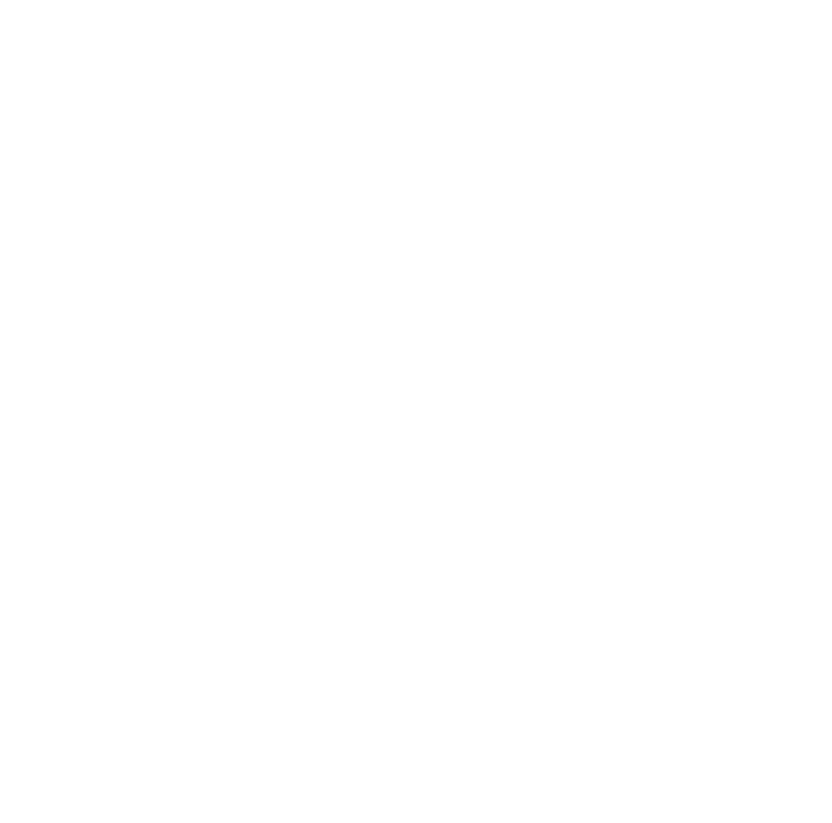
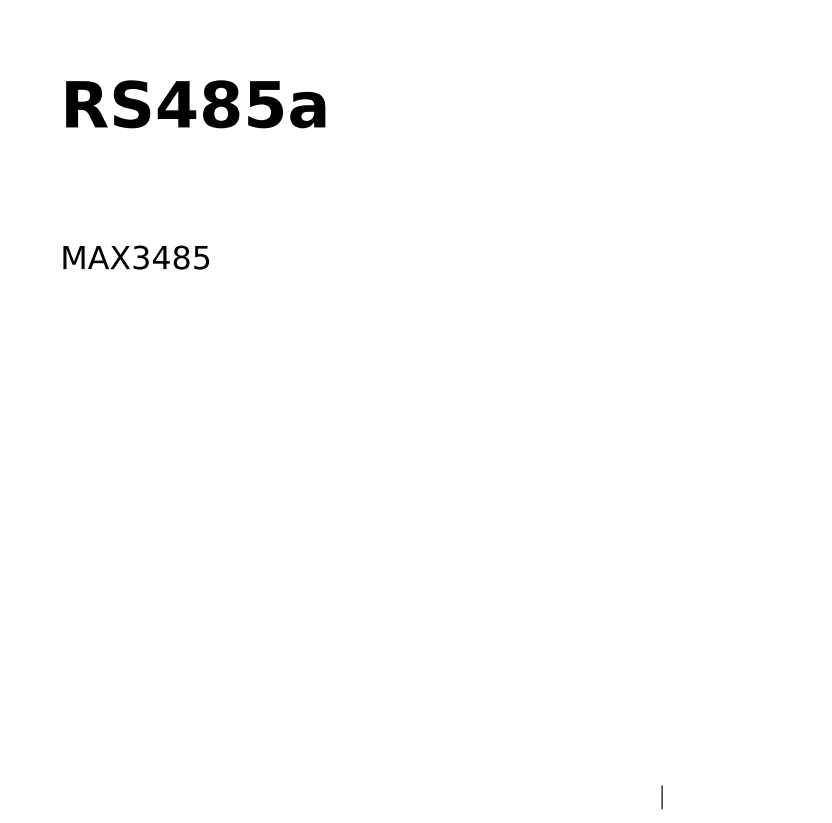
text: none -> RS485a (195, 104)
text: none -> MAX3485 (136, 257)
wire: none -> (662, 785) (662, 808)

